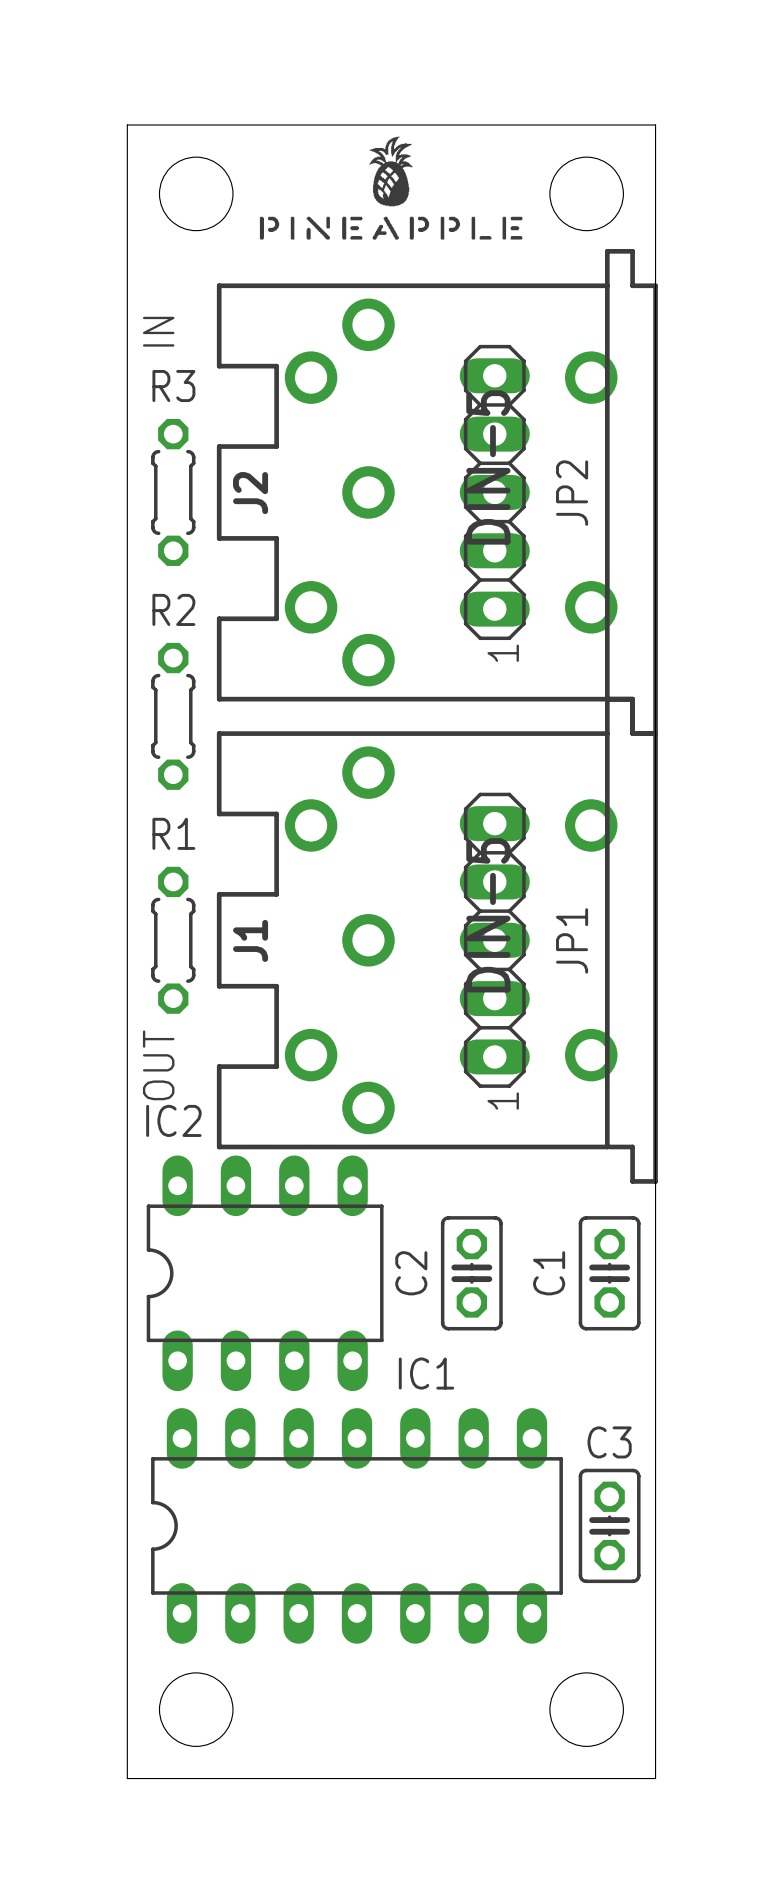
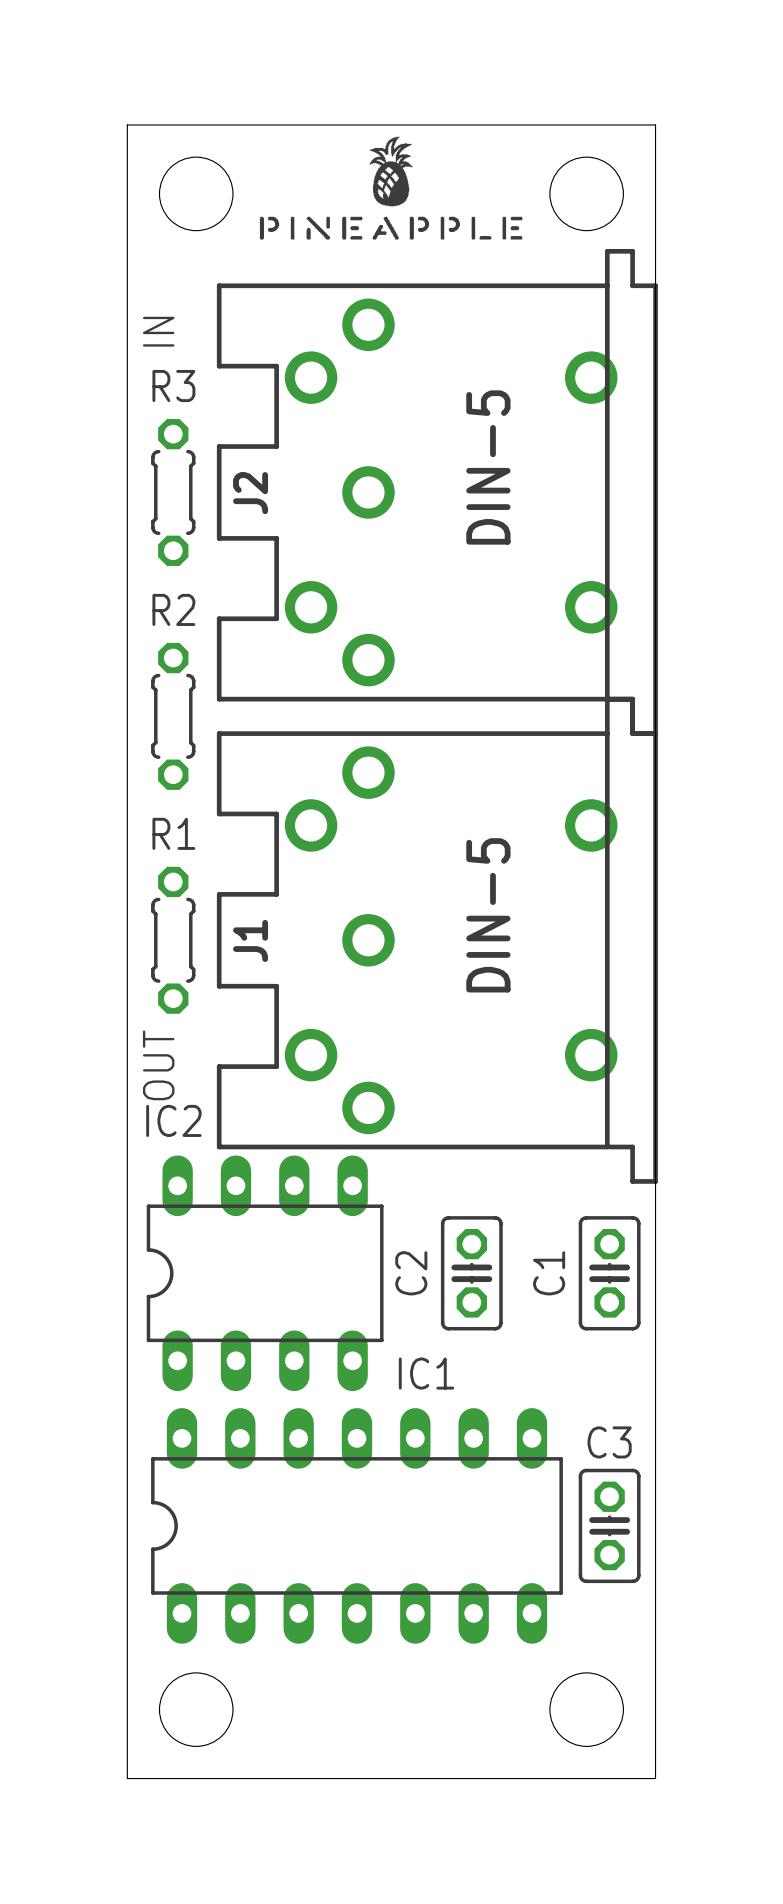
JP2: (494, 492) -> none
text: 1 (503, 653) -> none
JP1: (494, 940) -> none
text: 1 (503, 1101) -> none

